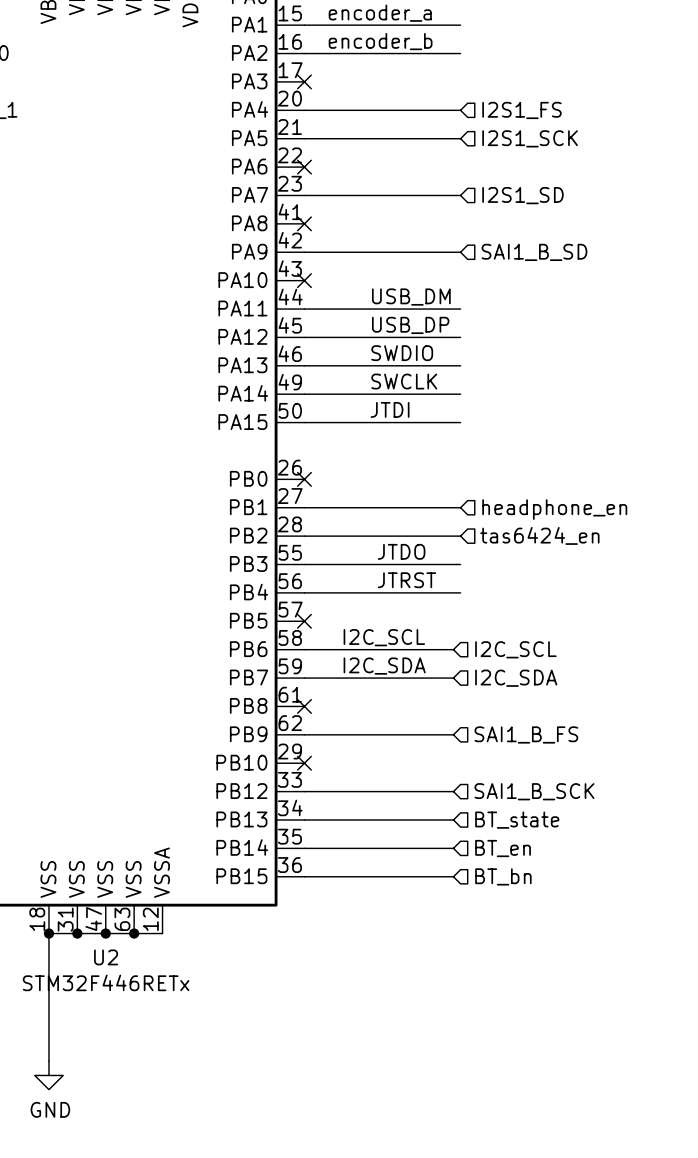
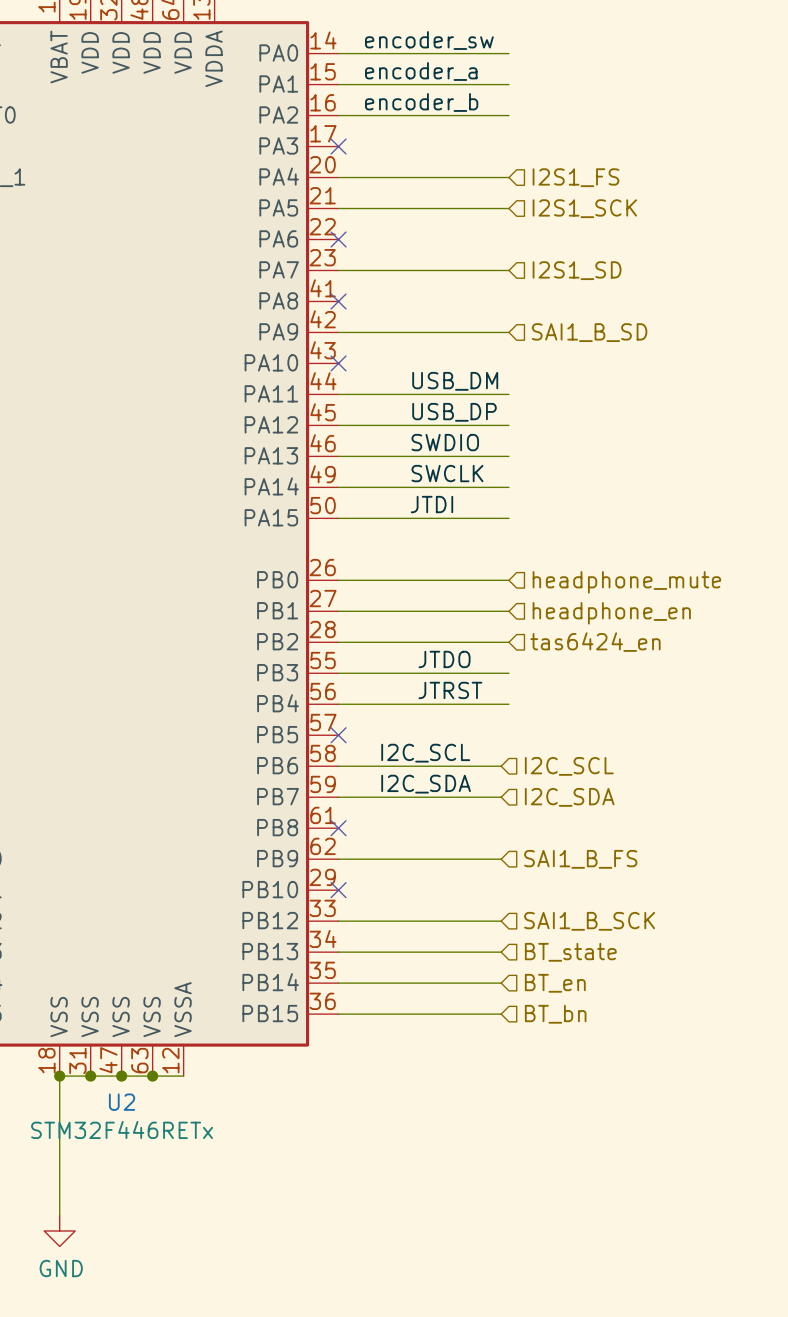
wire: none -> (338, 580) (508, 580)
no-connect mark: (304, 479) -> none
hierarchical label: none -> headphone_mute (626, 582)

